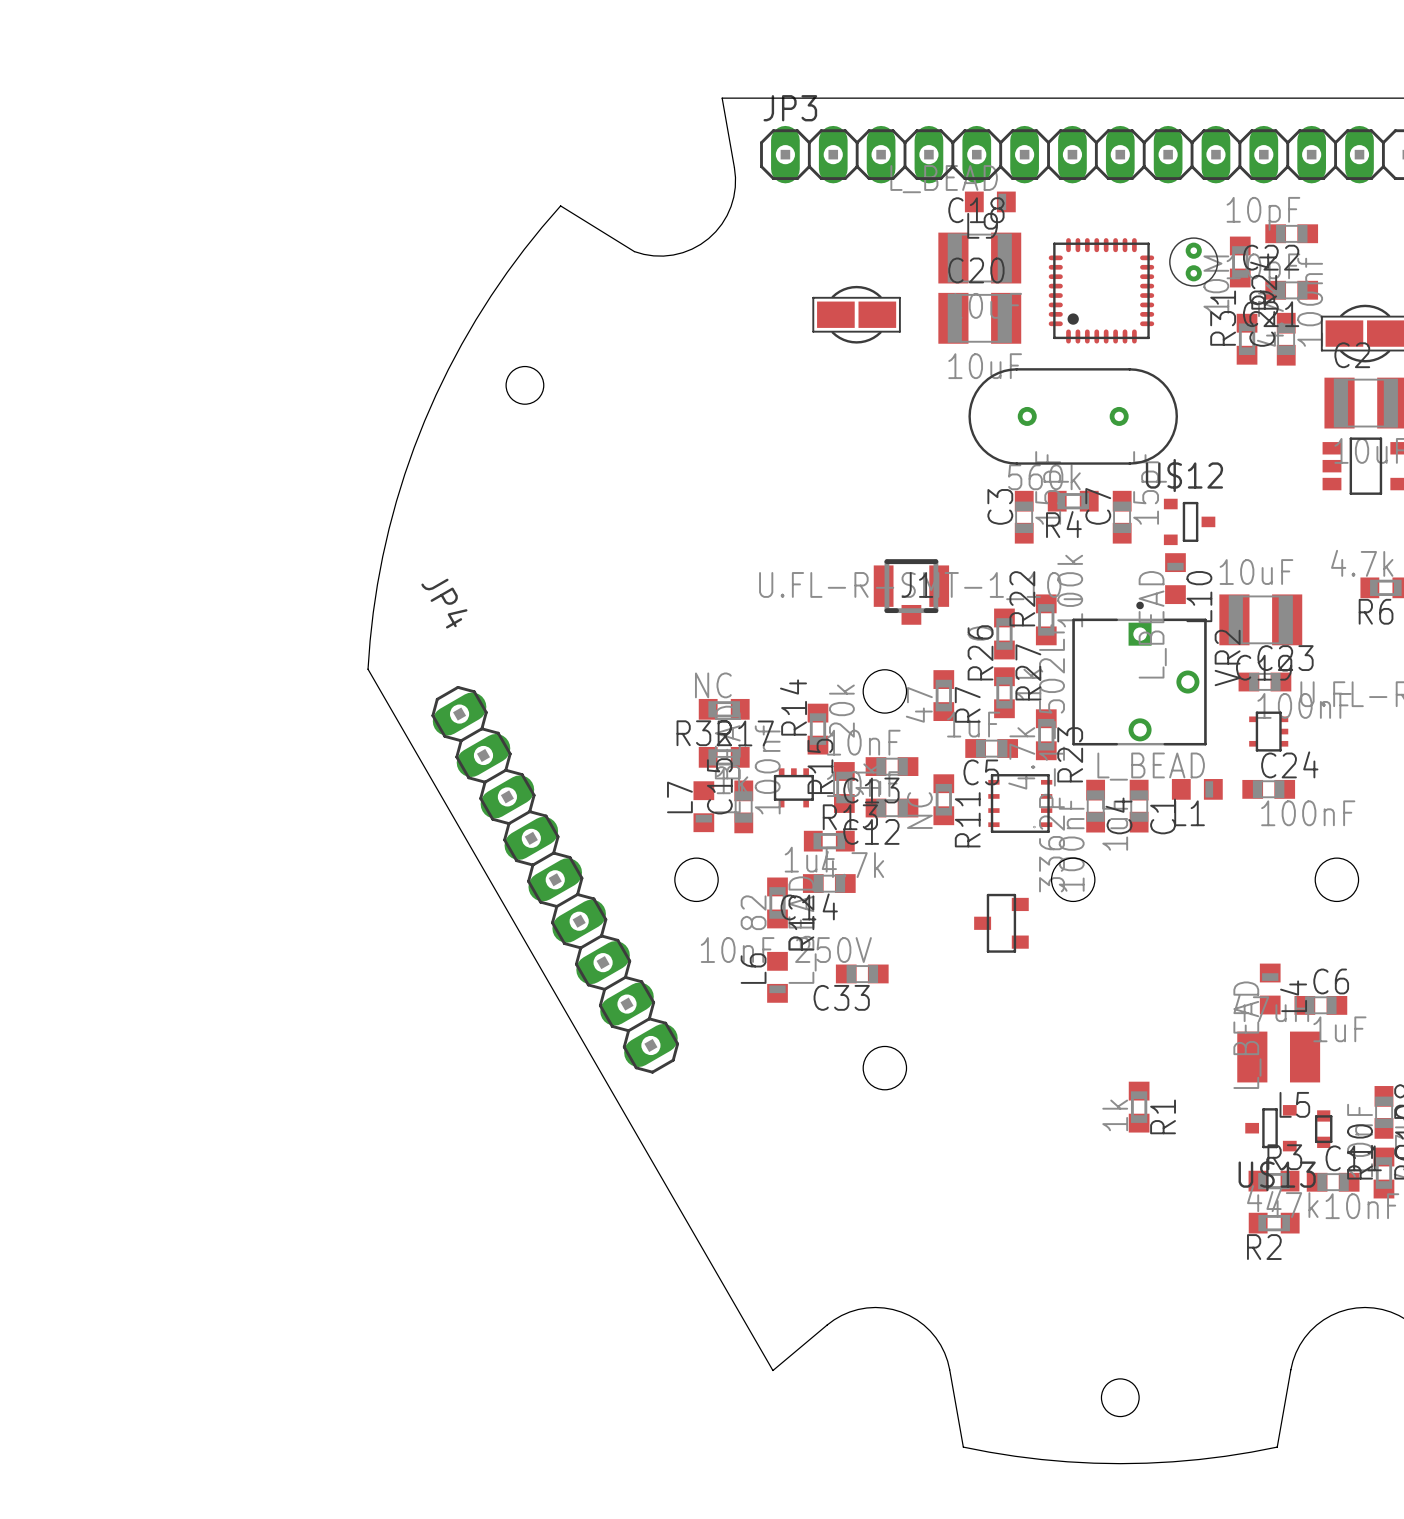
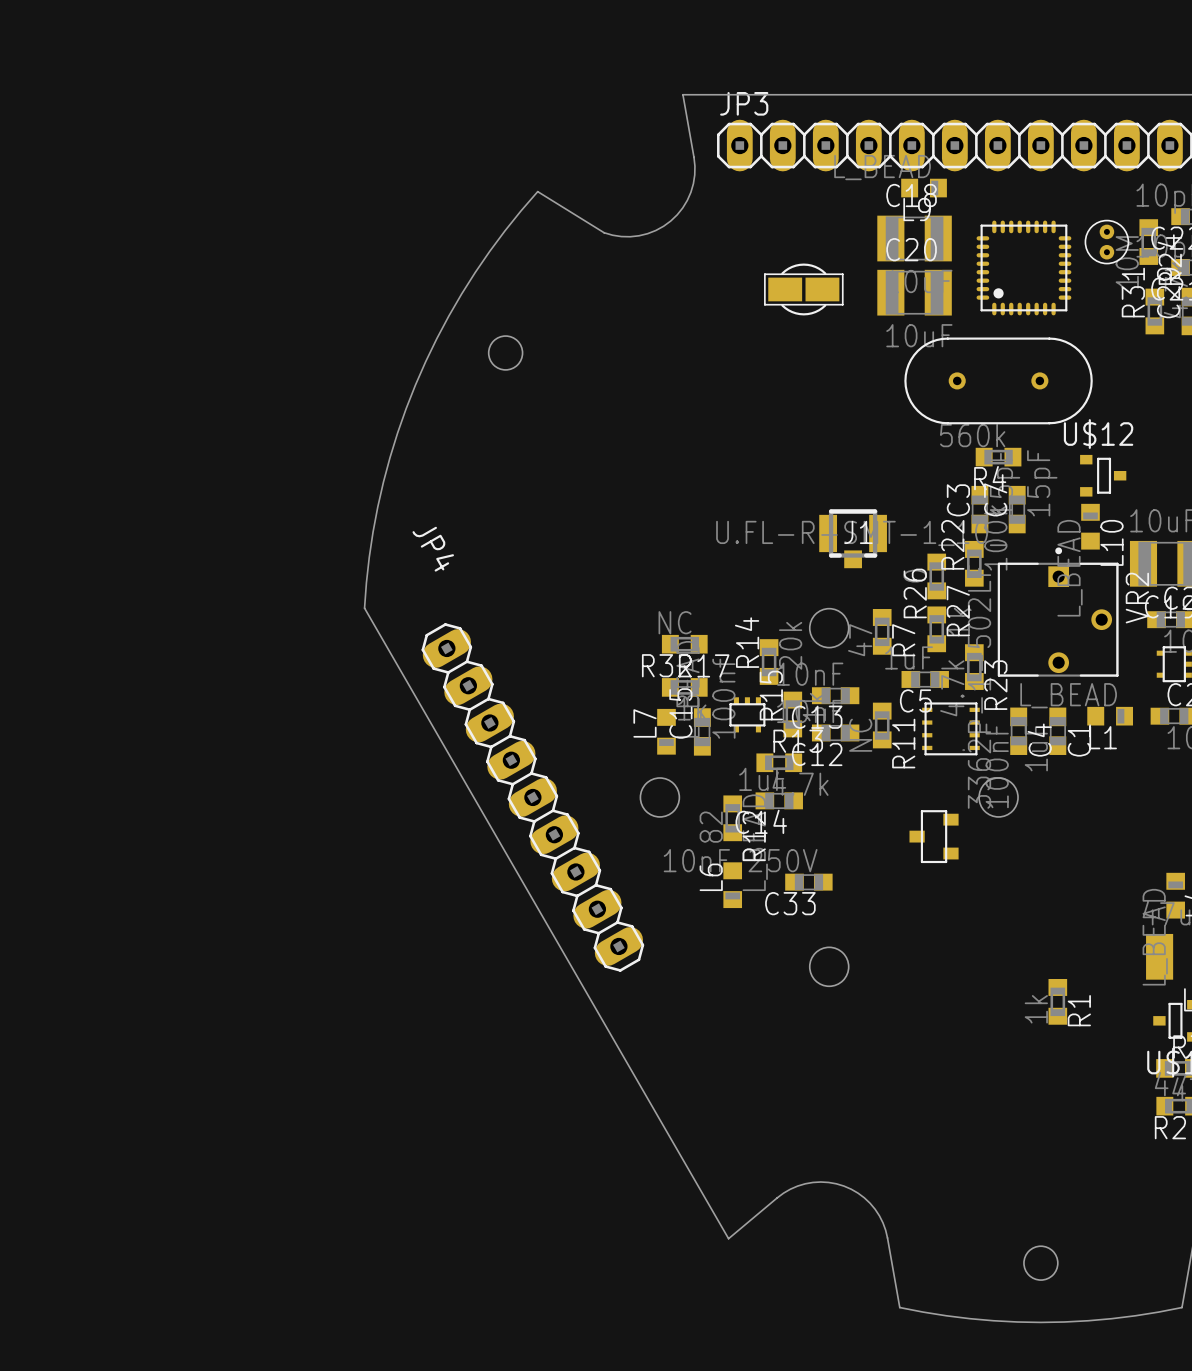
C3 position: (1024, 517) -> (979, 509)
C7 position: (1122, 517) -> (1017, 509)

